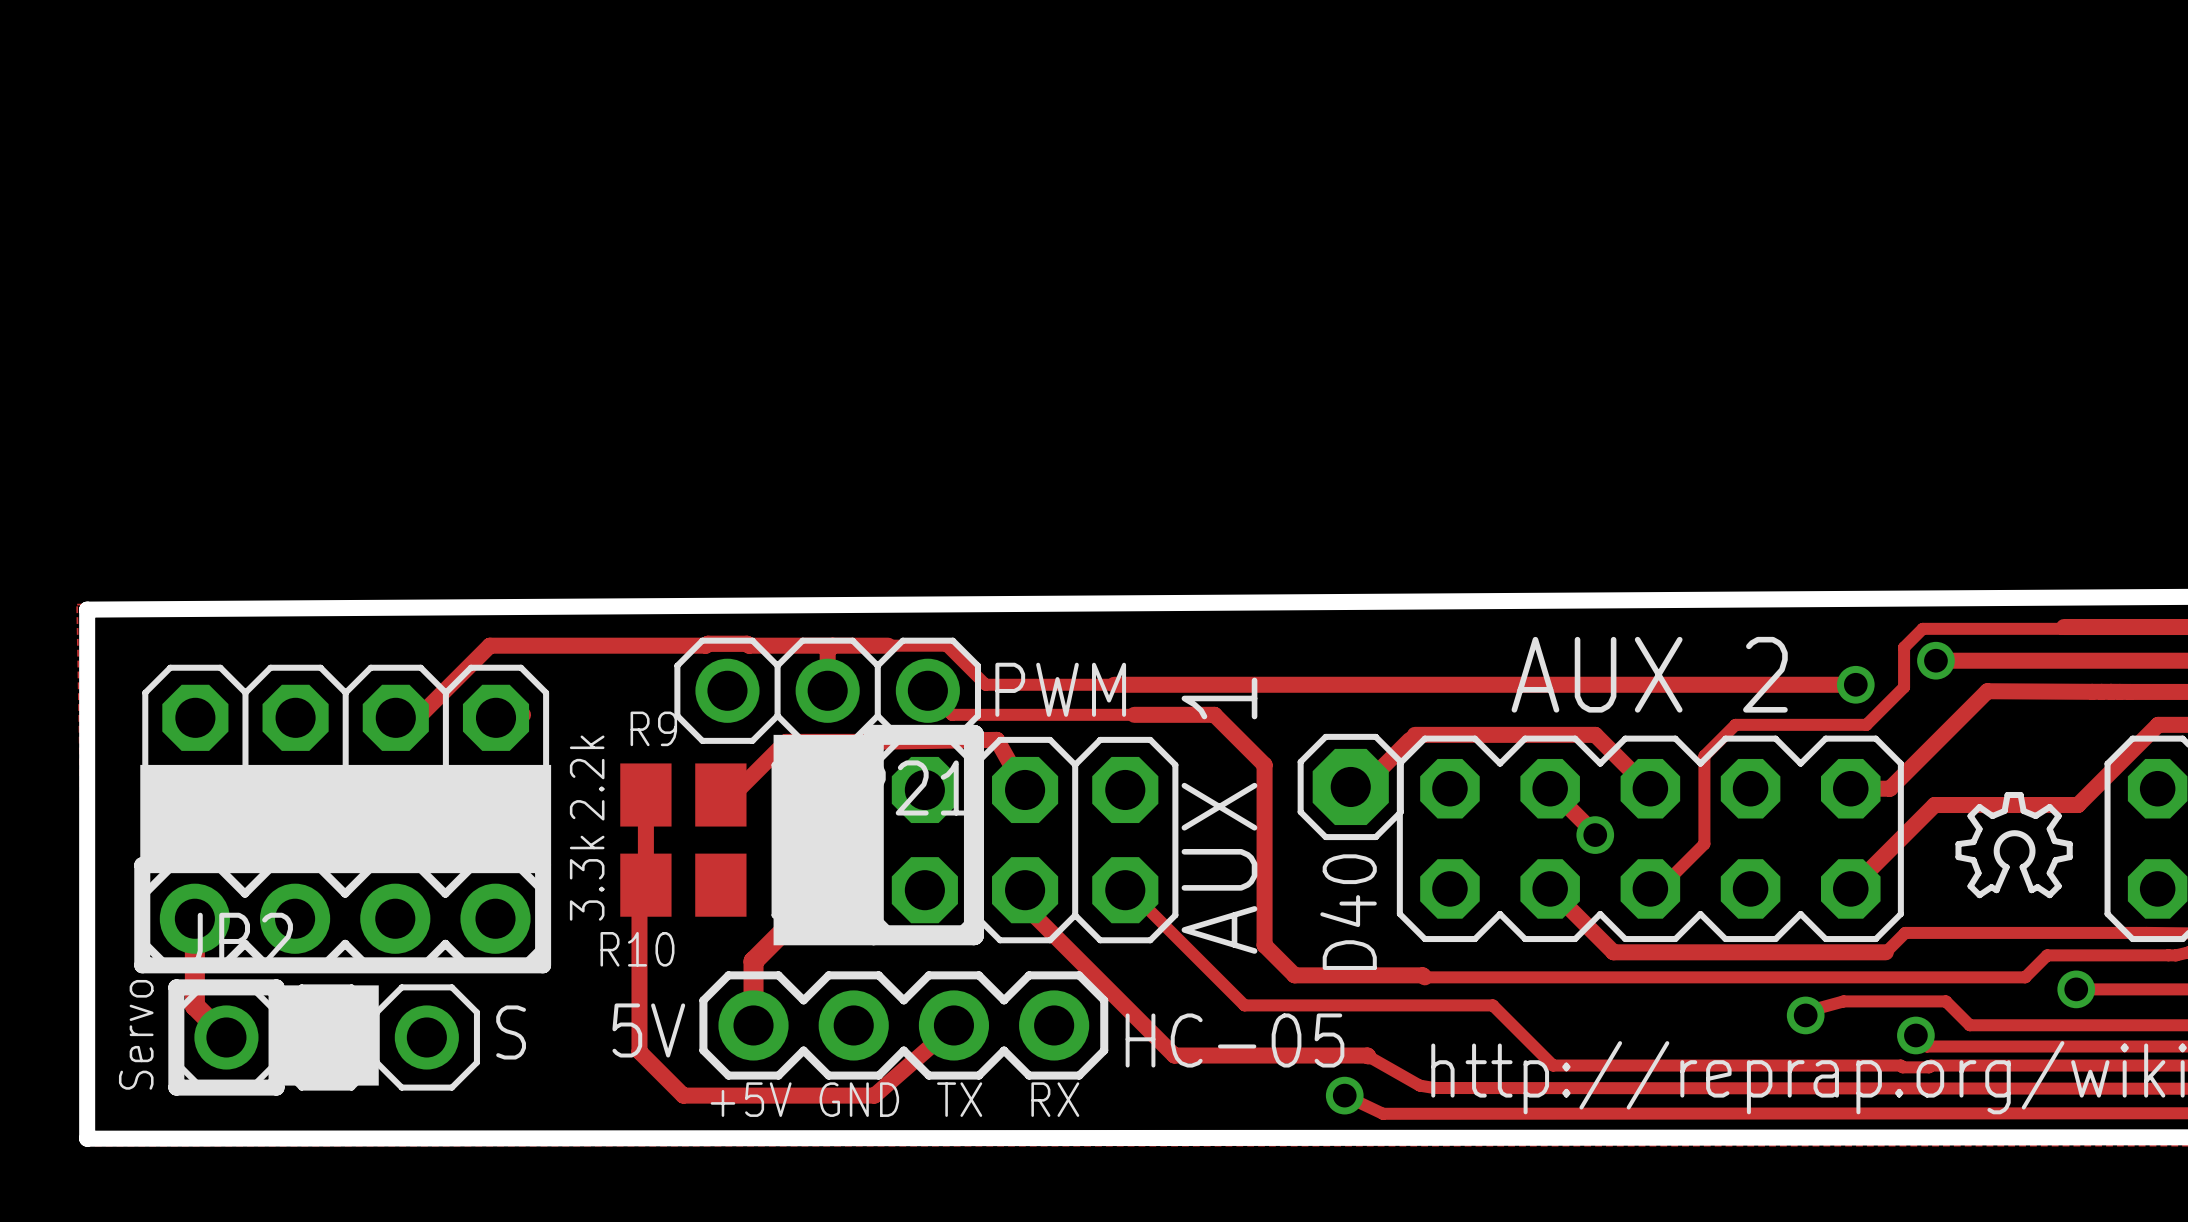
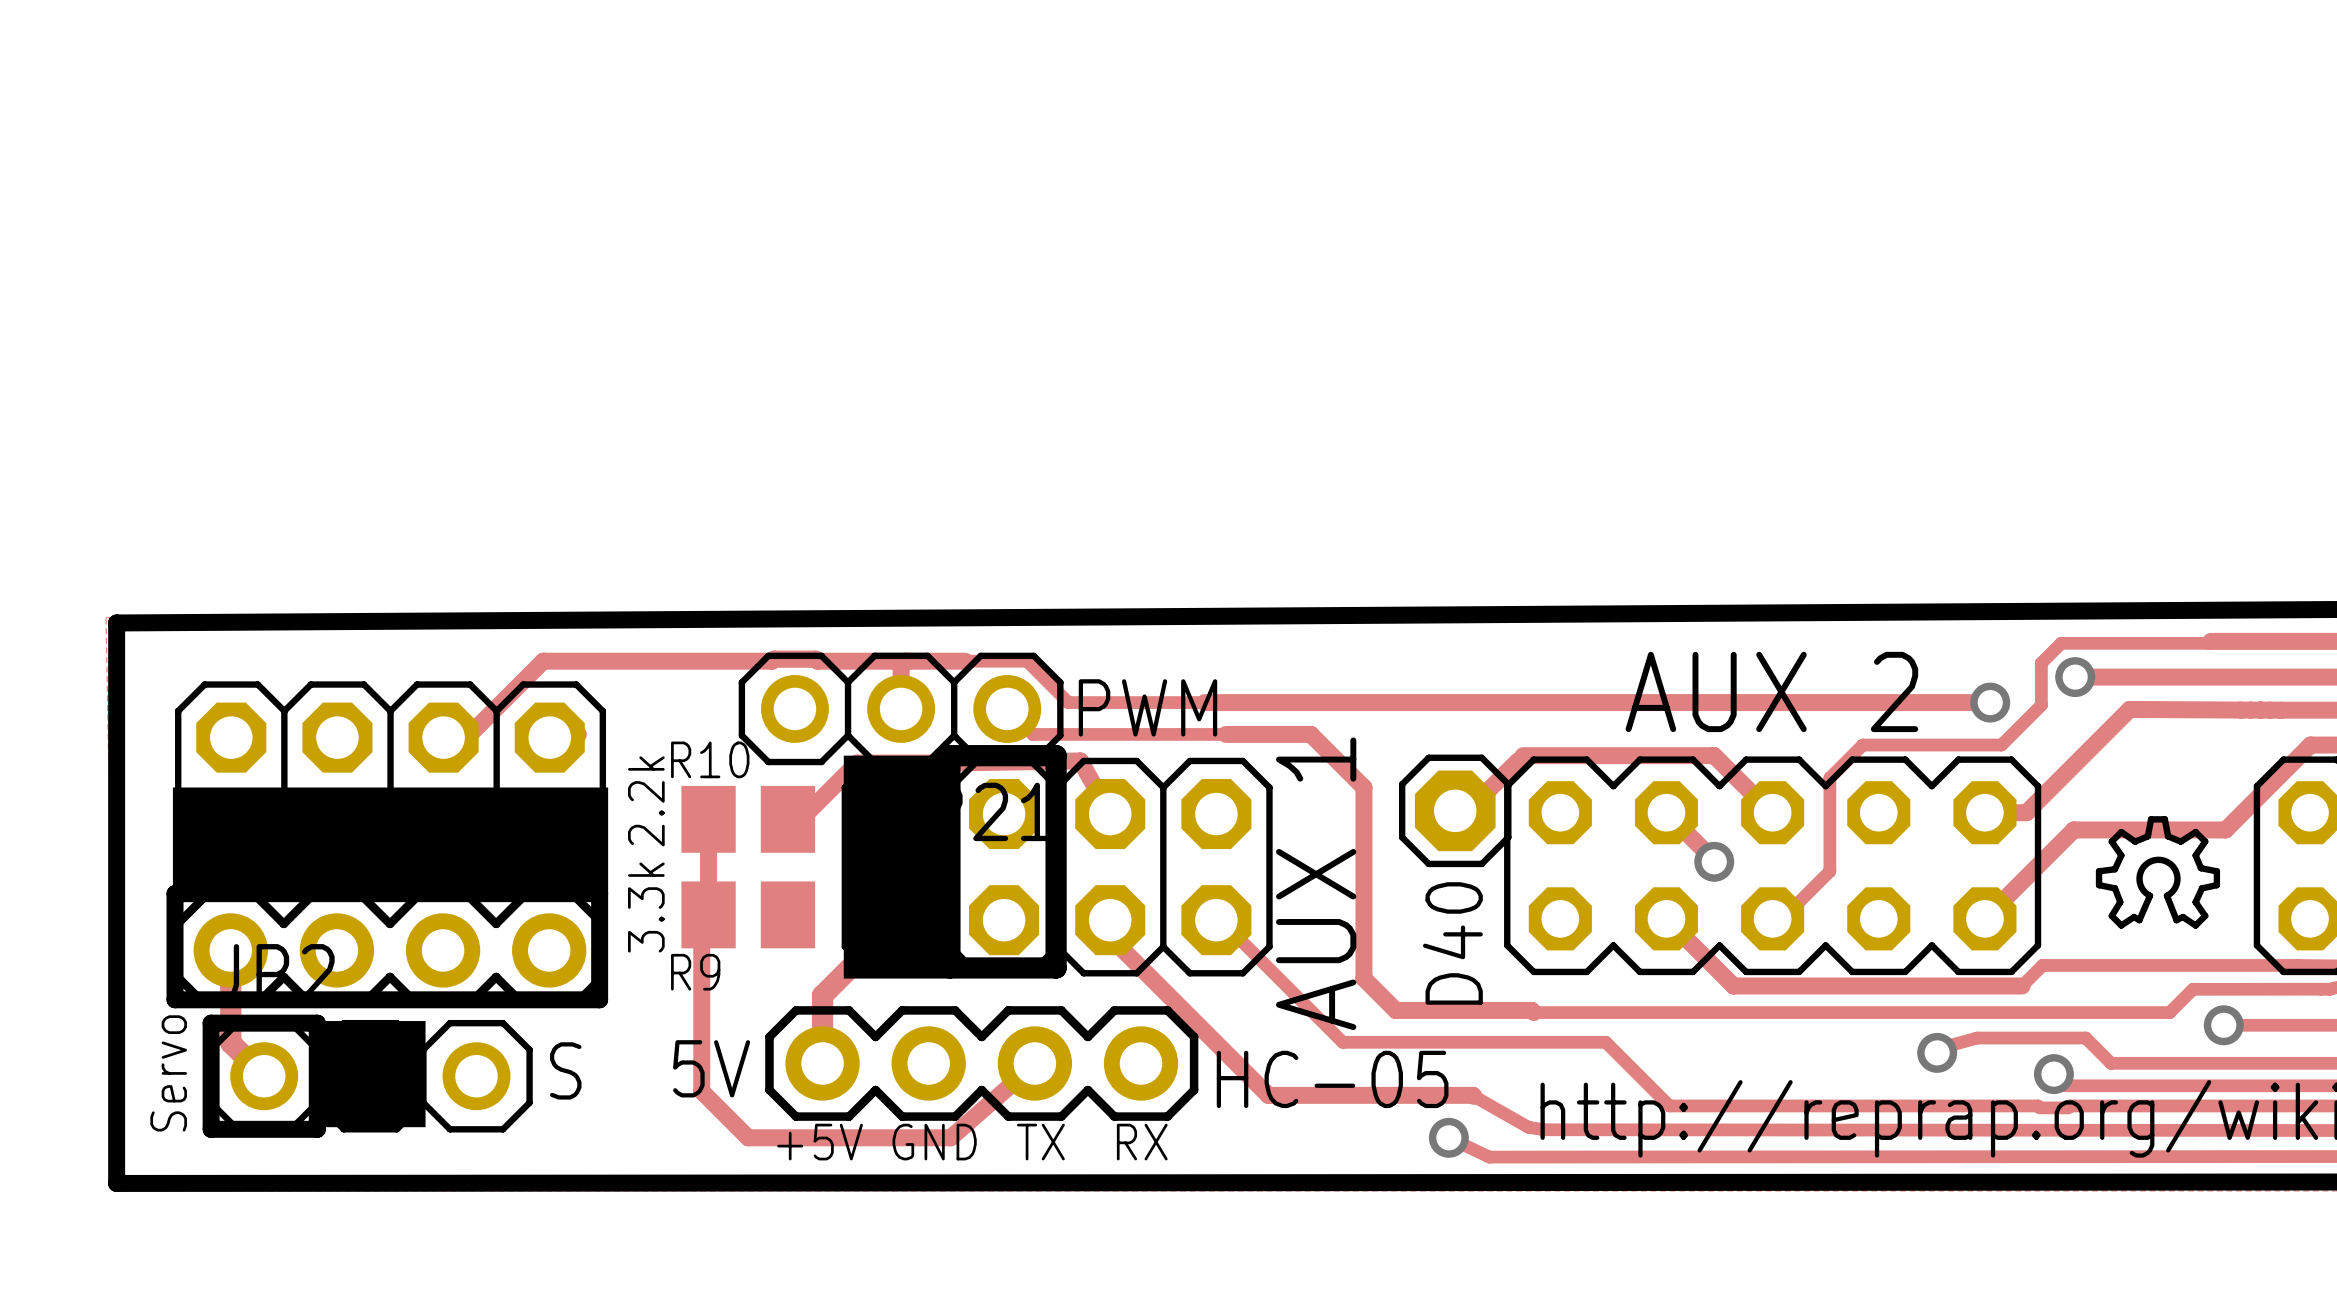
text position: R9 (653, 728) -> R9 (695, 972)
text position: AUX 1 (1219, 815) -> AUX 1 (1316, 883)
text position: R10 (637, 949) -> R10 (710, 759)

